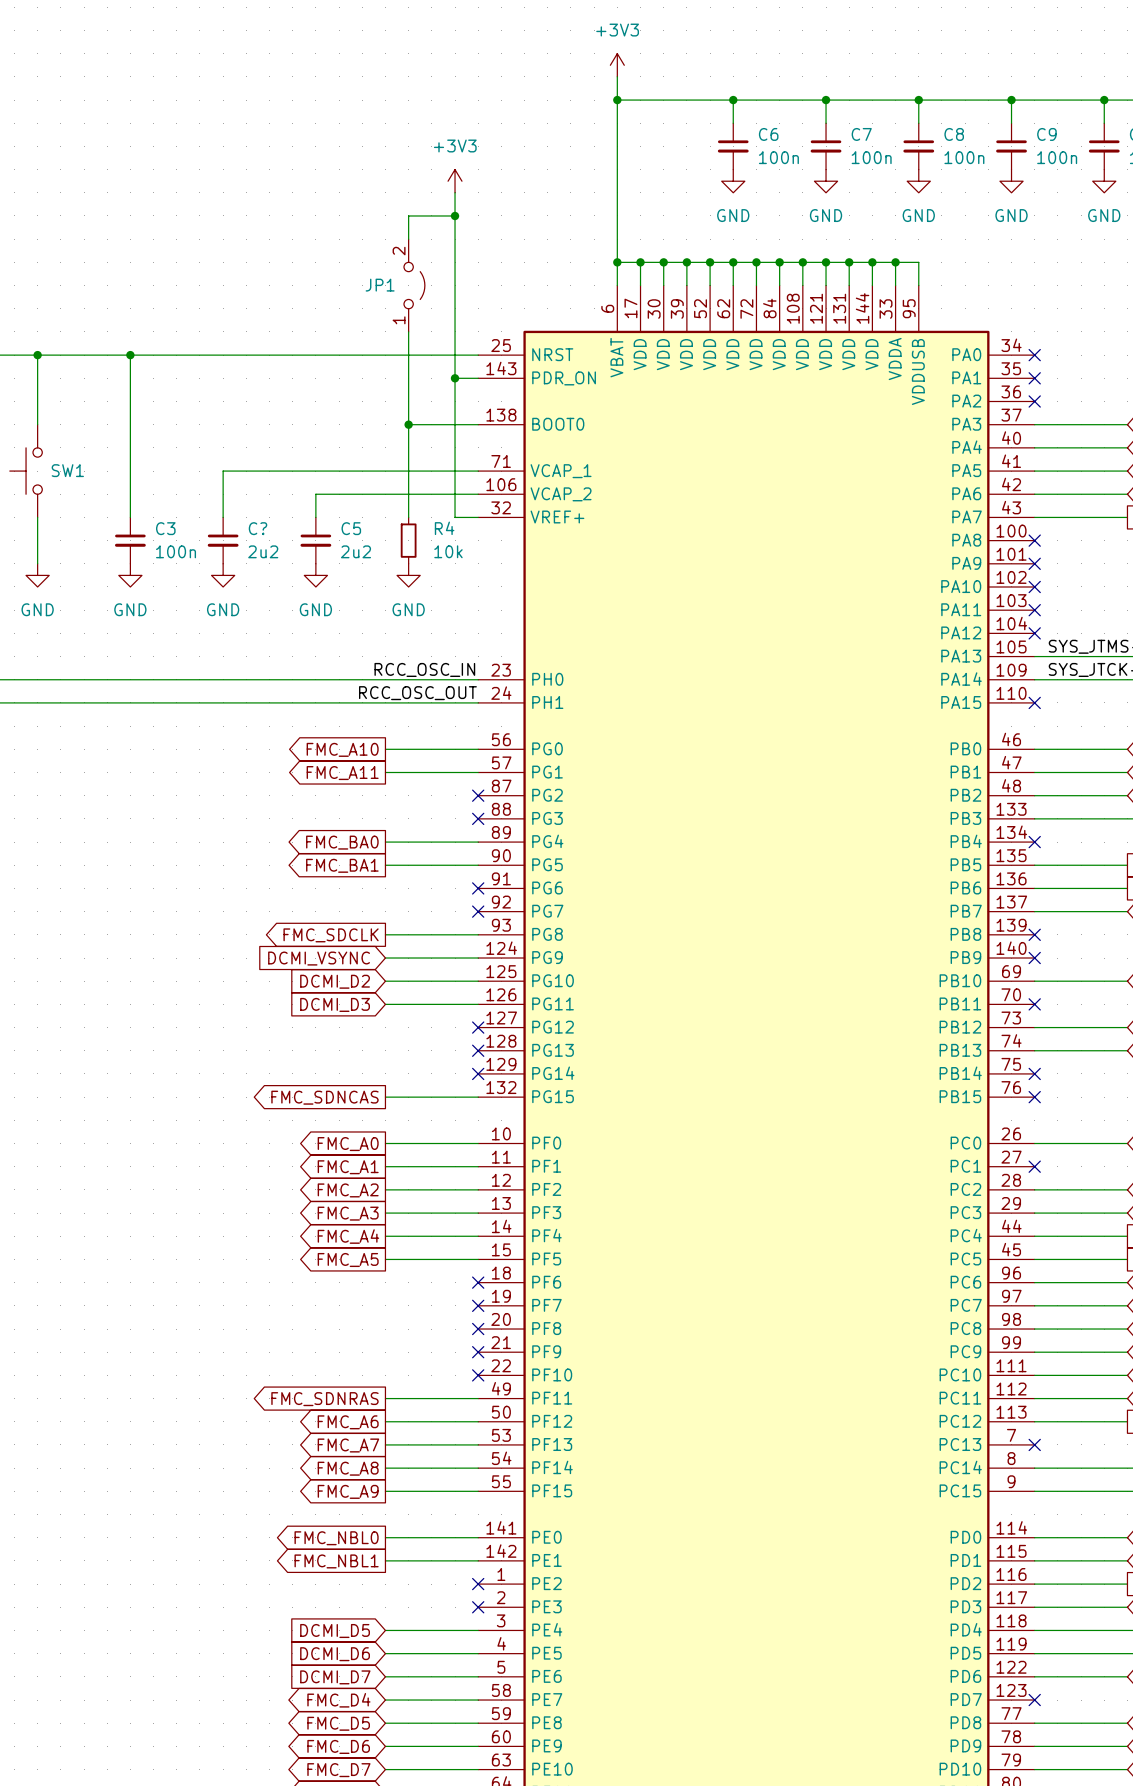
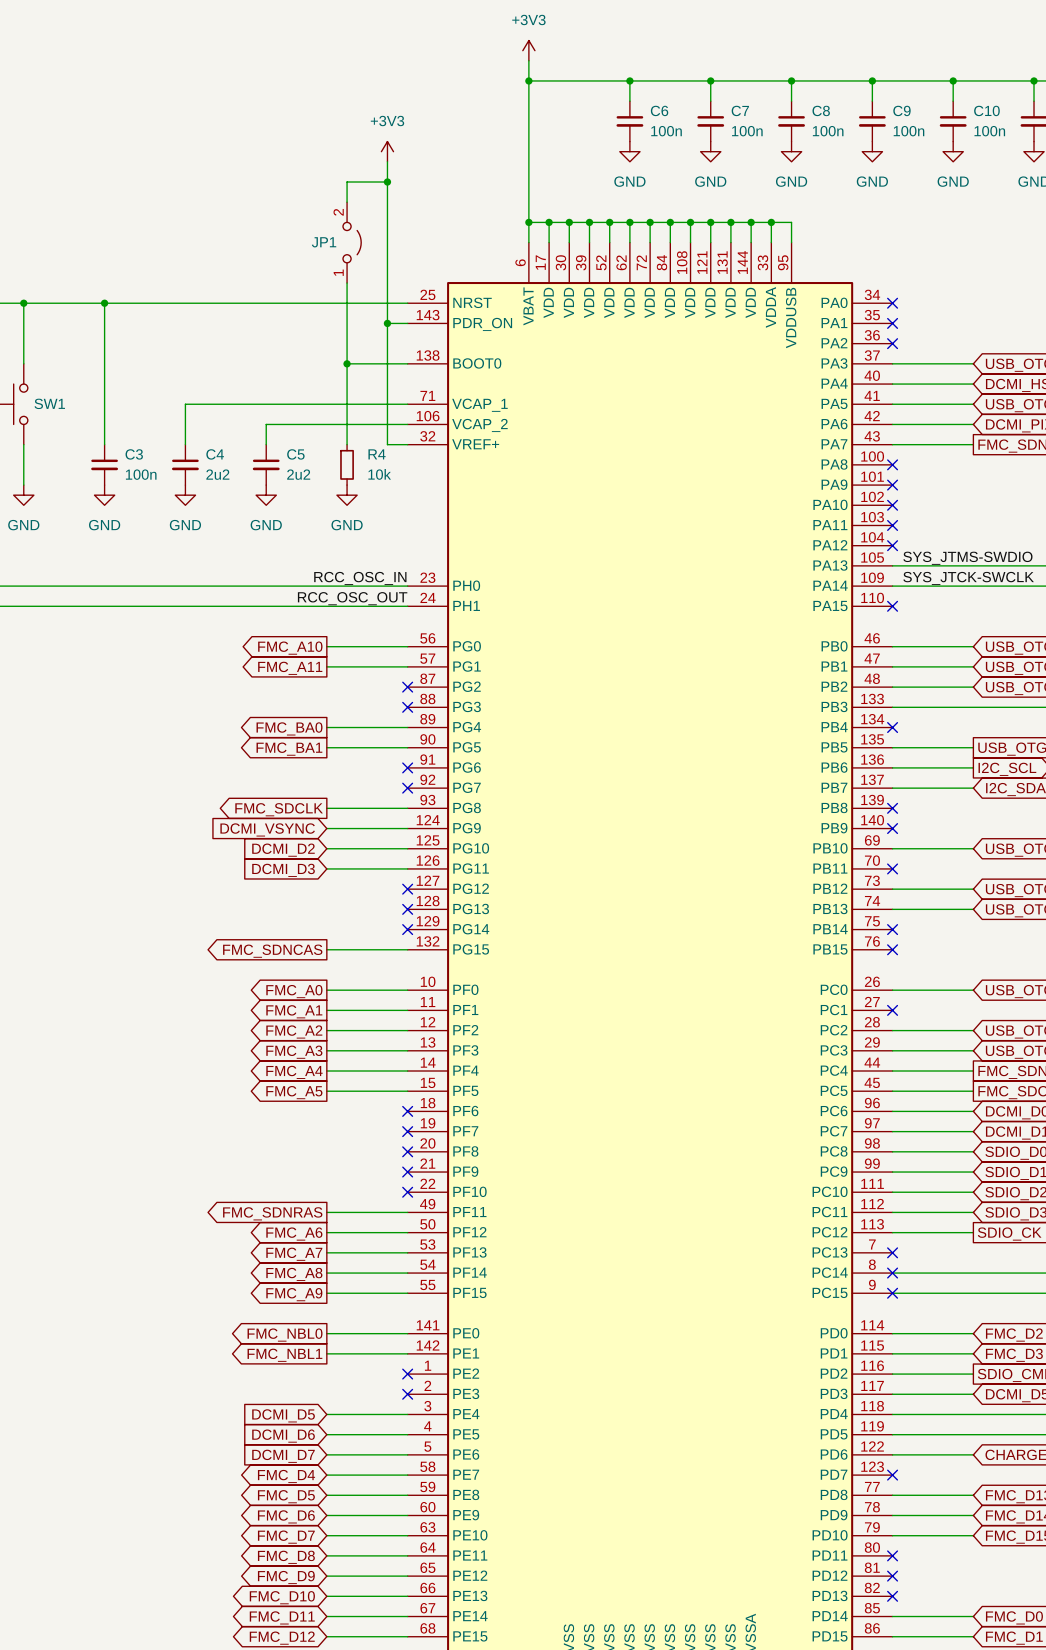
C? name: C? (258, 528) -> C4 (215, 454)
no-connect mark: none -> (892, 1273)
no-connect mark: none -> (892, 1293)

